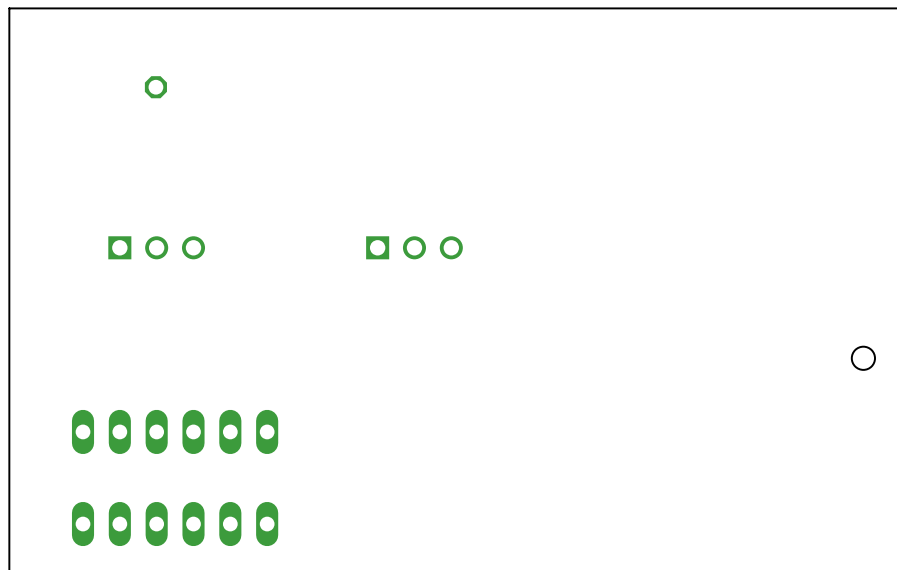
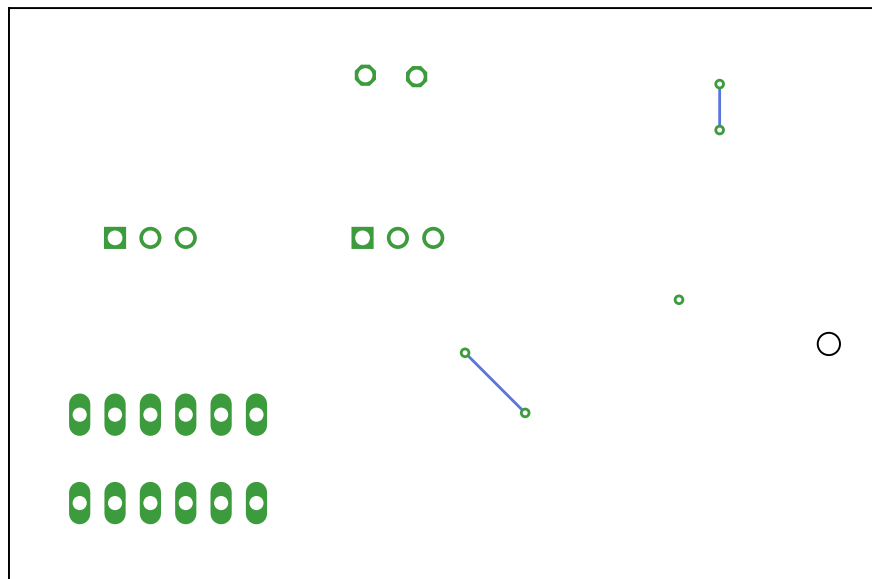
part: none -> (365, 75)
part: none -> (416, 76)
part: (155, 87) -> none
track: none -> (719, 84) (719, 130)
via: none -> (719, 84)
via: none -> (719, 130)
via: none -> (678, 299)
track: none -> (465, 352) (523, 411) (526, 411) (525, 412)
via: none -> (465, 352)
via: none -> (525, 412)

